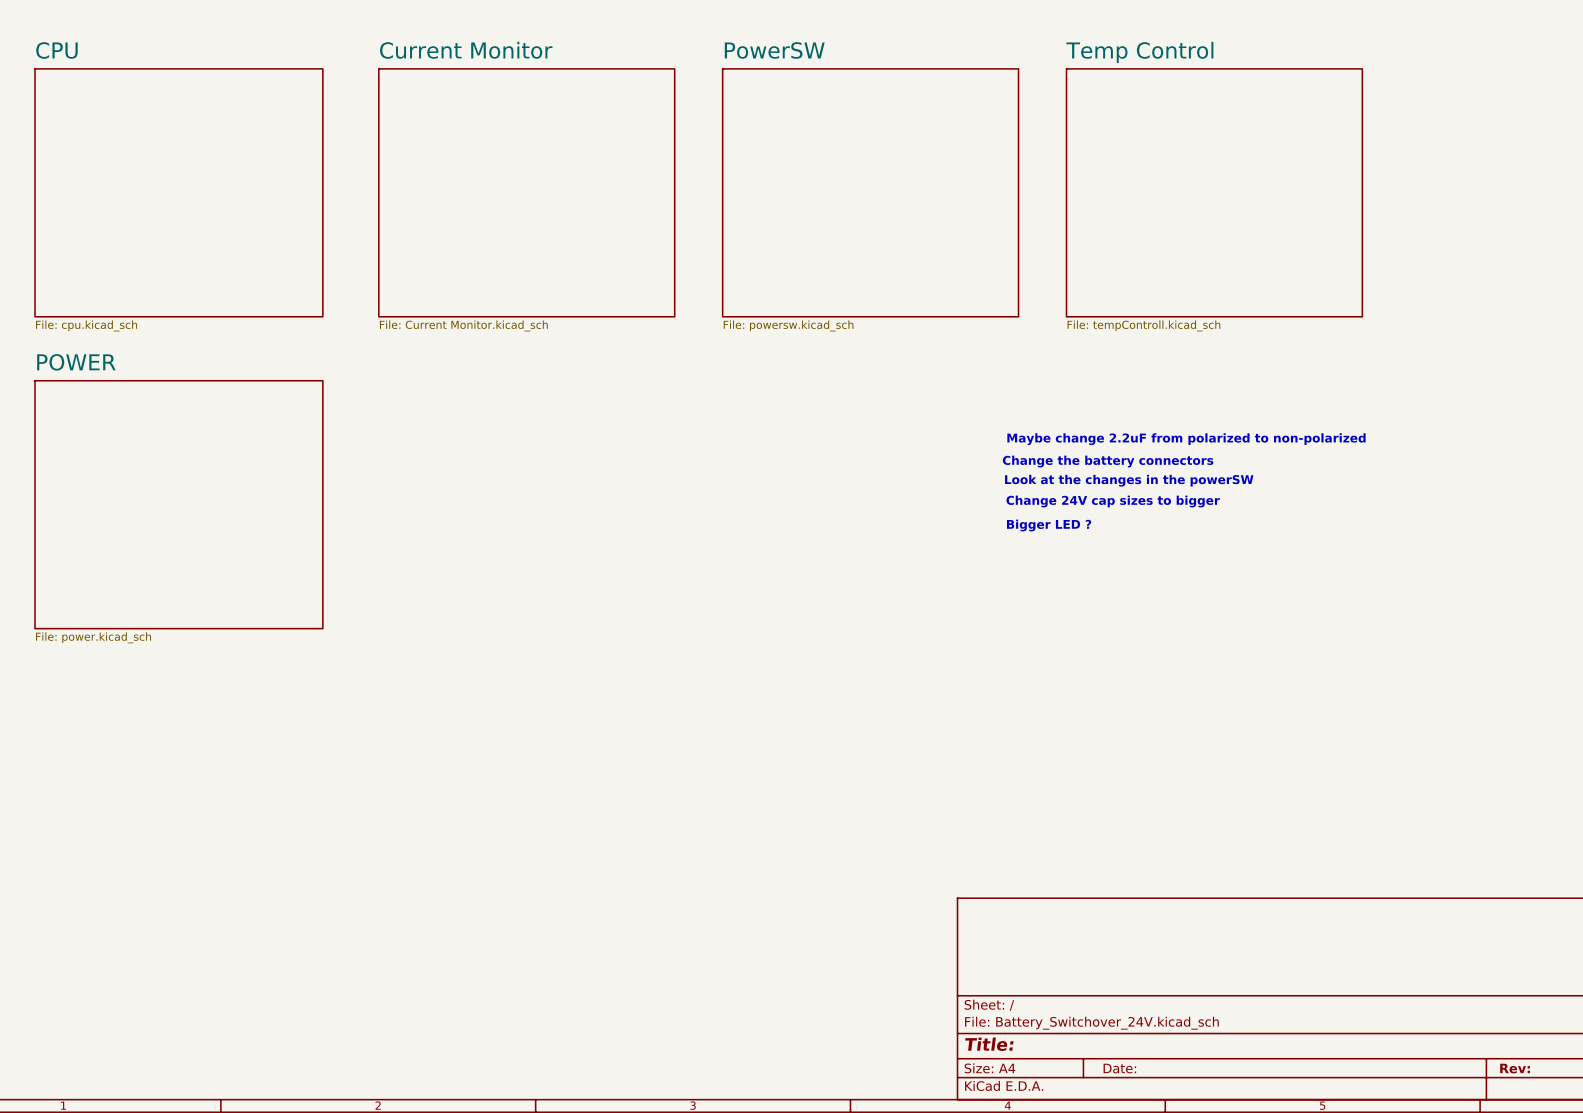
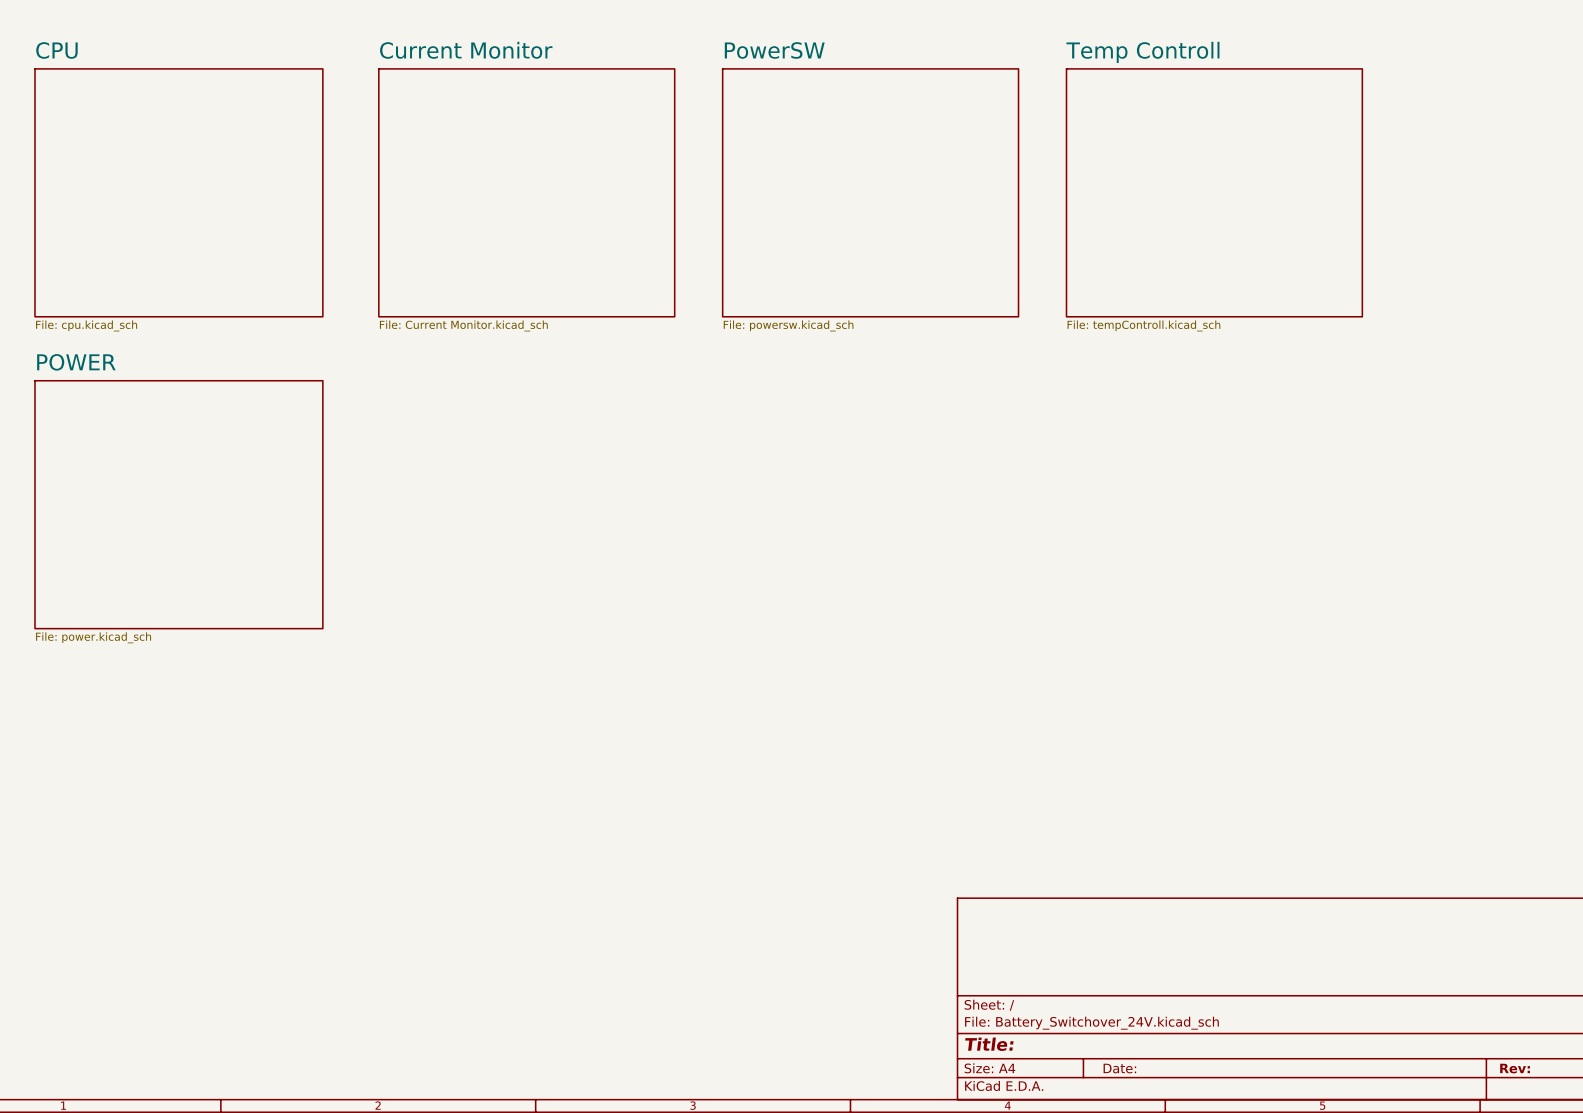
sheet Temp Control name: Temp Control (1139, 52) -> Temp Controll (1142, 52)
text: Maybe change 2.2uF from polarized to non-polarized (1186, 439) -> none
text: Change the battery connectors (1108, 461) -> none
text: Look at the changes in the powerSW (1129, 480) -> none
text: Change 24V cap sizes to bigger (1113, 501) -> none
text: Bigger LED ? (1049, 525) -> none

